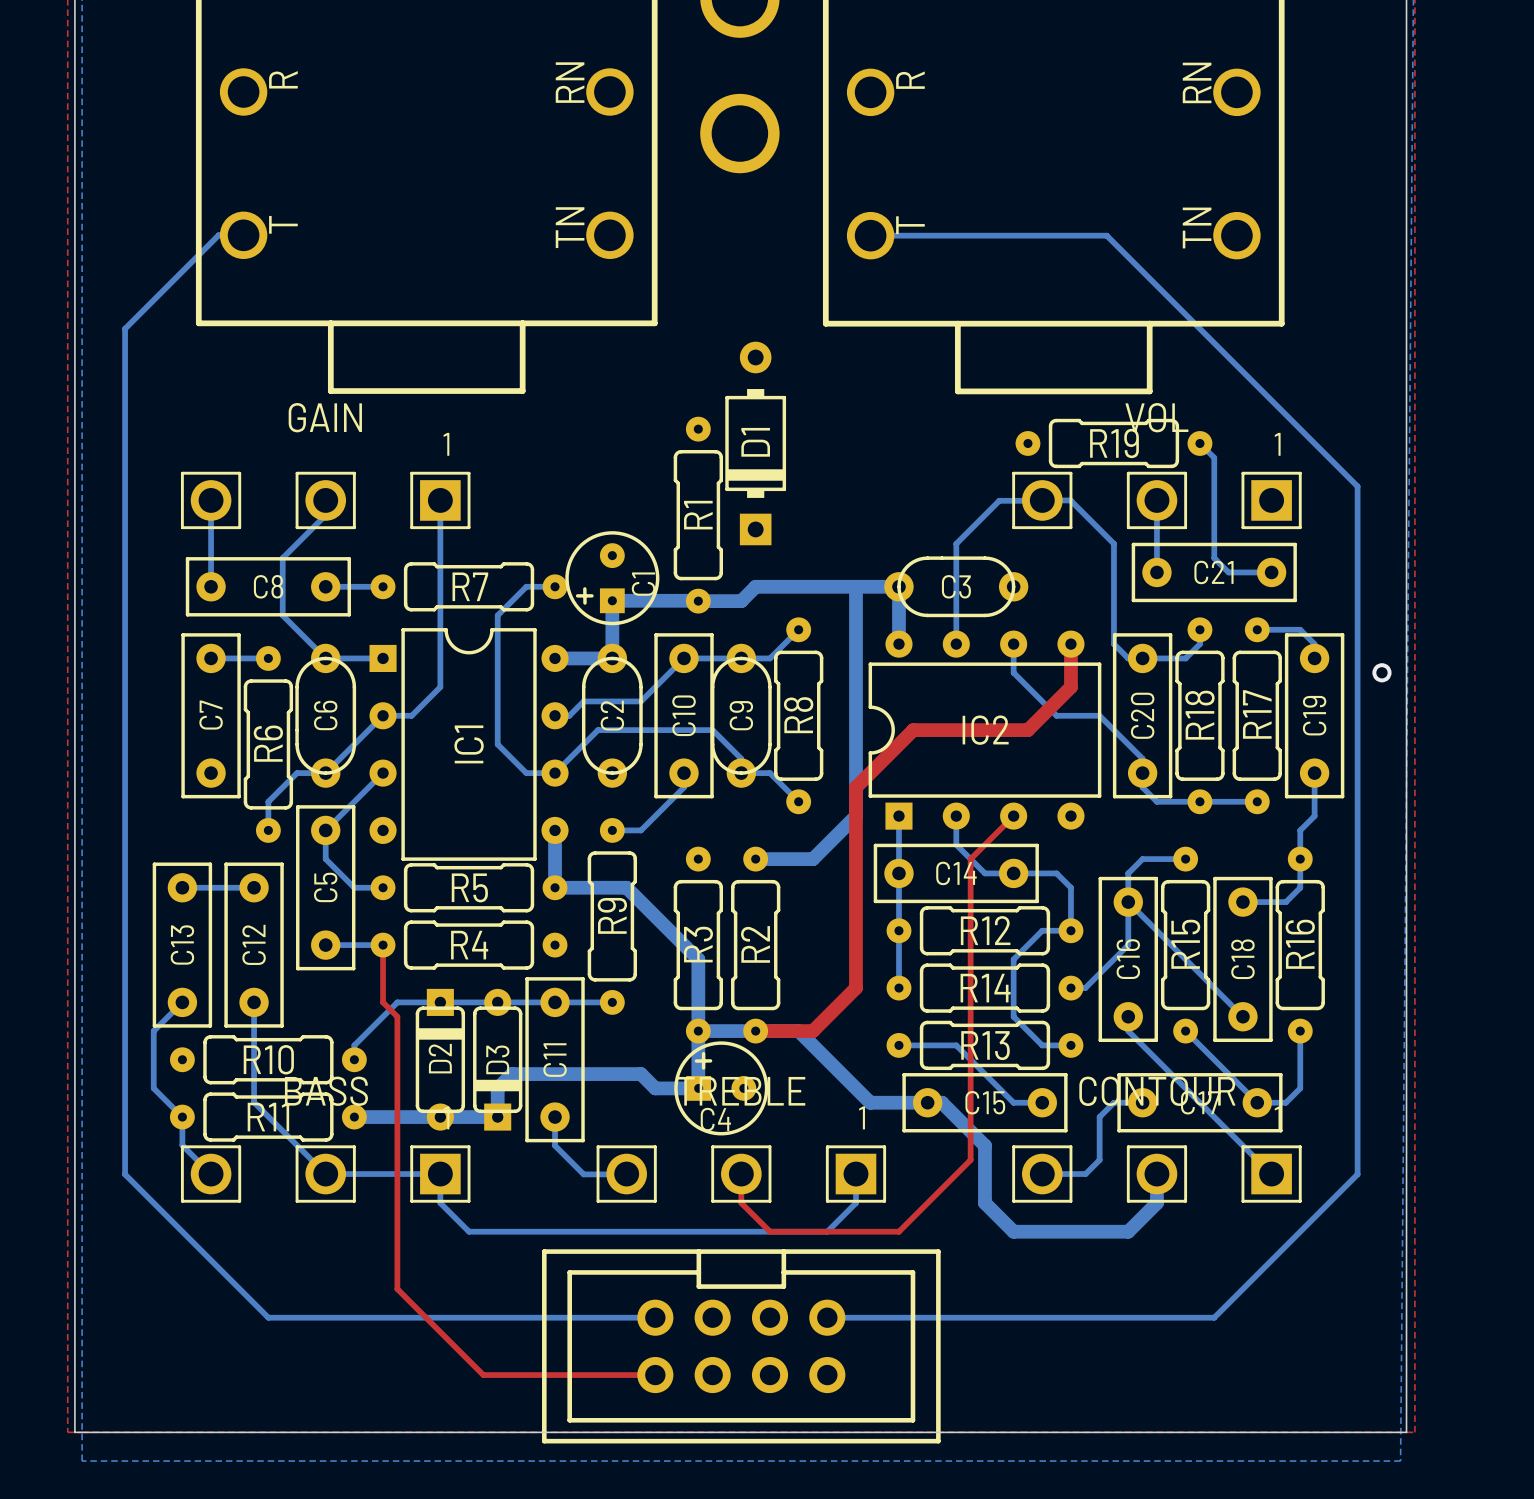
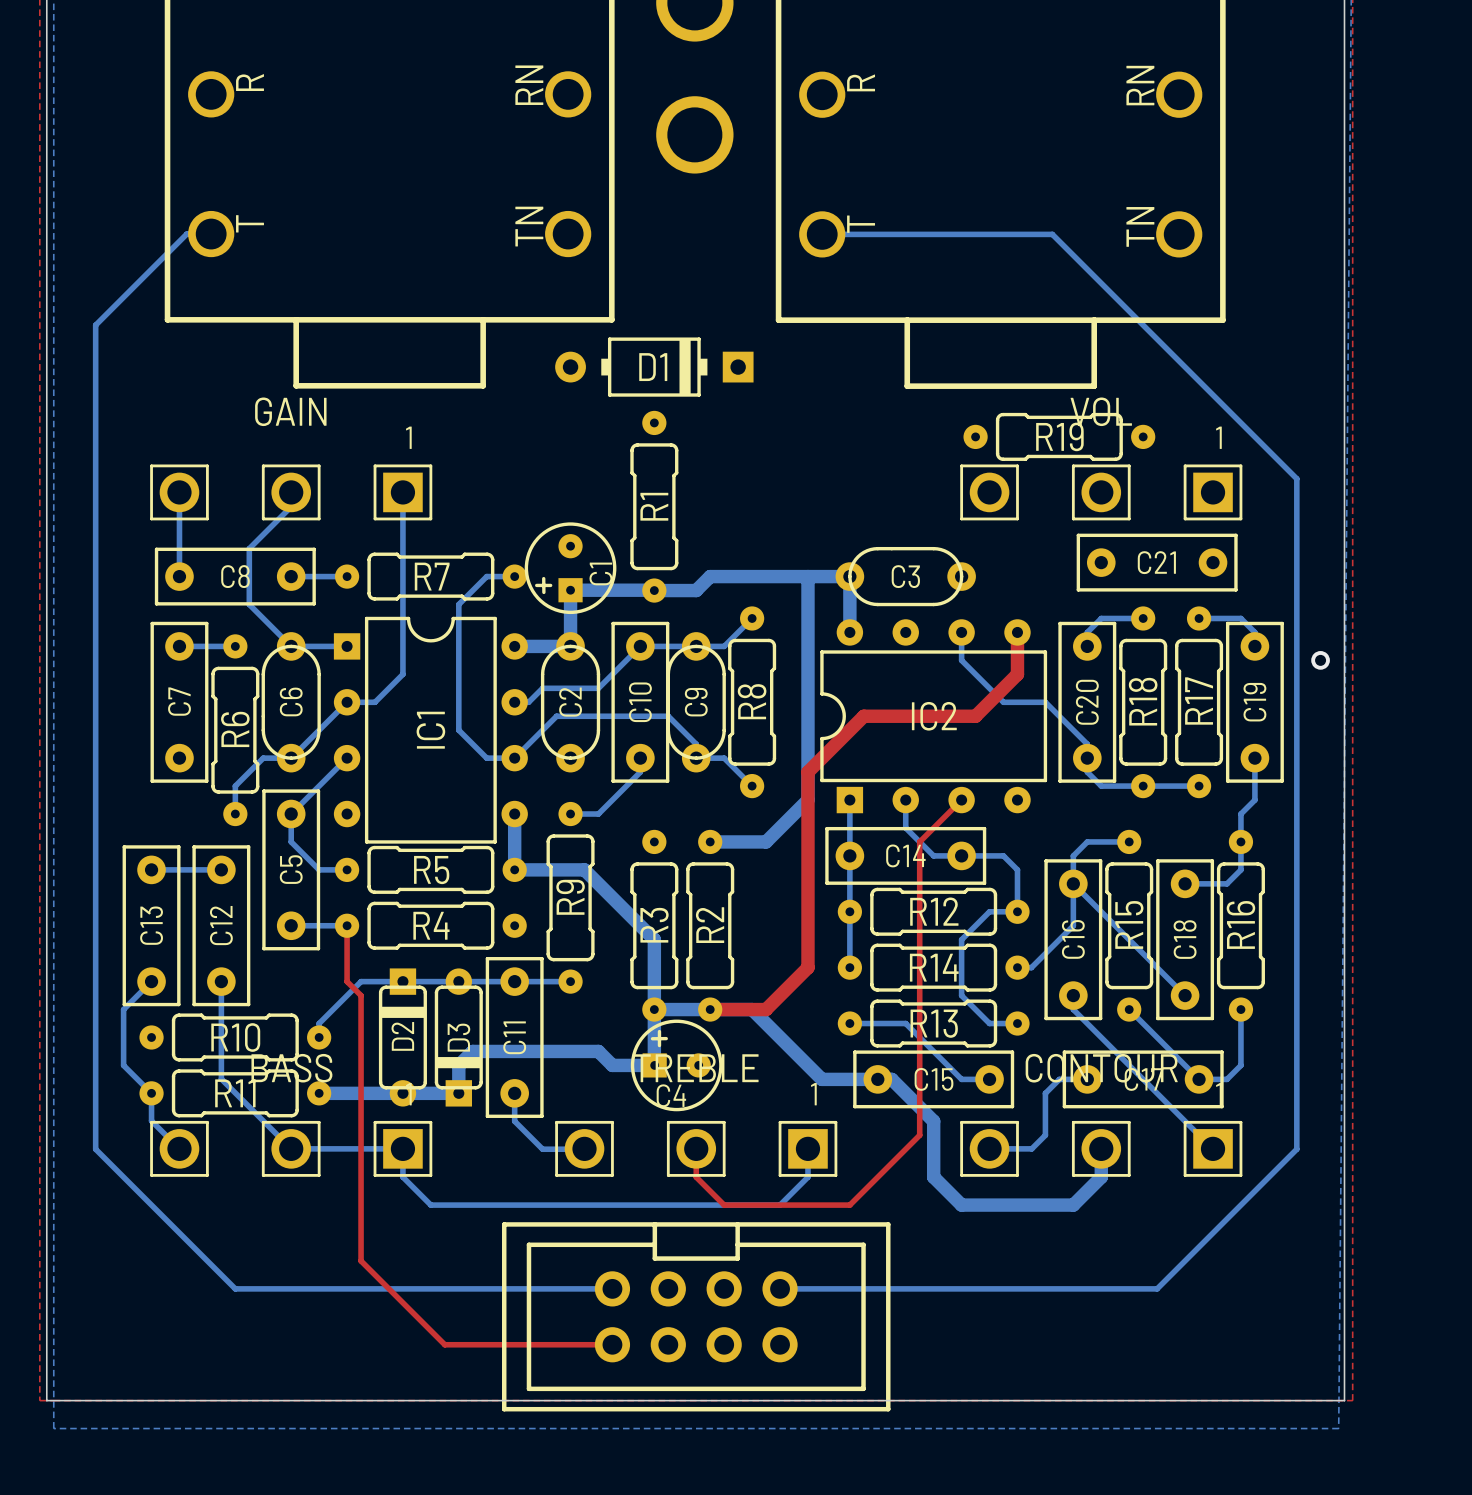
D1 rotation: 0° (755, 443) -> 90° counterclockwise (654, 367)
bottom track: (1199, 443) (1214, 457) (1214, 558) (1228, 572) (1271, 572) -> none
bottom track: (1156, 500) (1156, 572) -> none
bottom track: (1199, 629) (1199, 644) (1185, 658) (1128, 658) (1113, 644) (1113, 543) (1070, 500) (999, 500) (956, 543) (956, 644) -> (1143, 618) (1101, 618) (1087, 632) (1087, 646)

